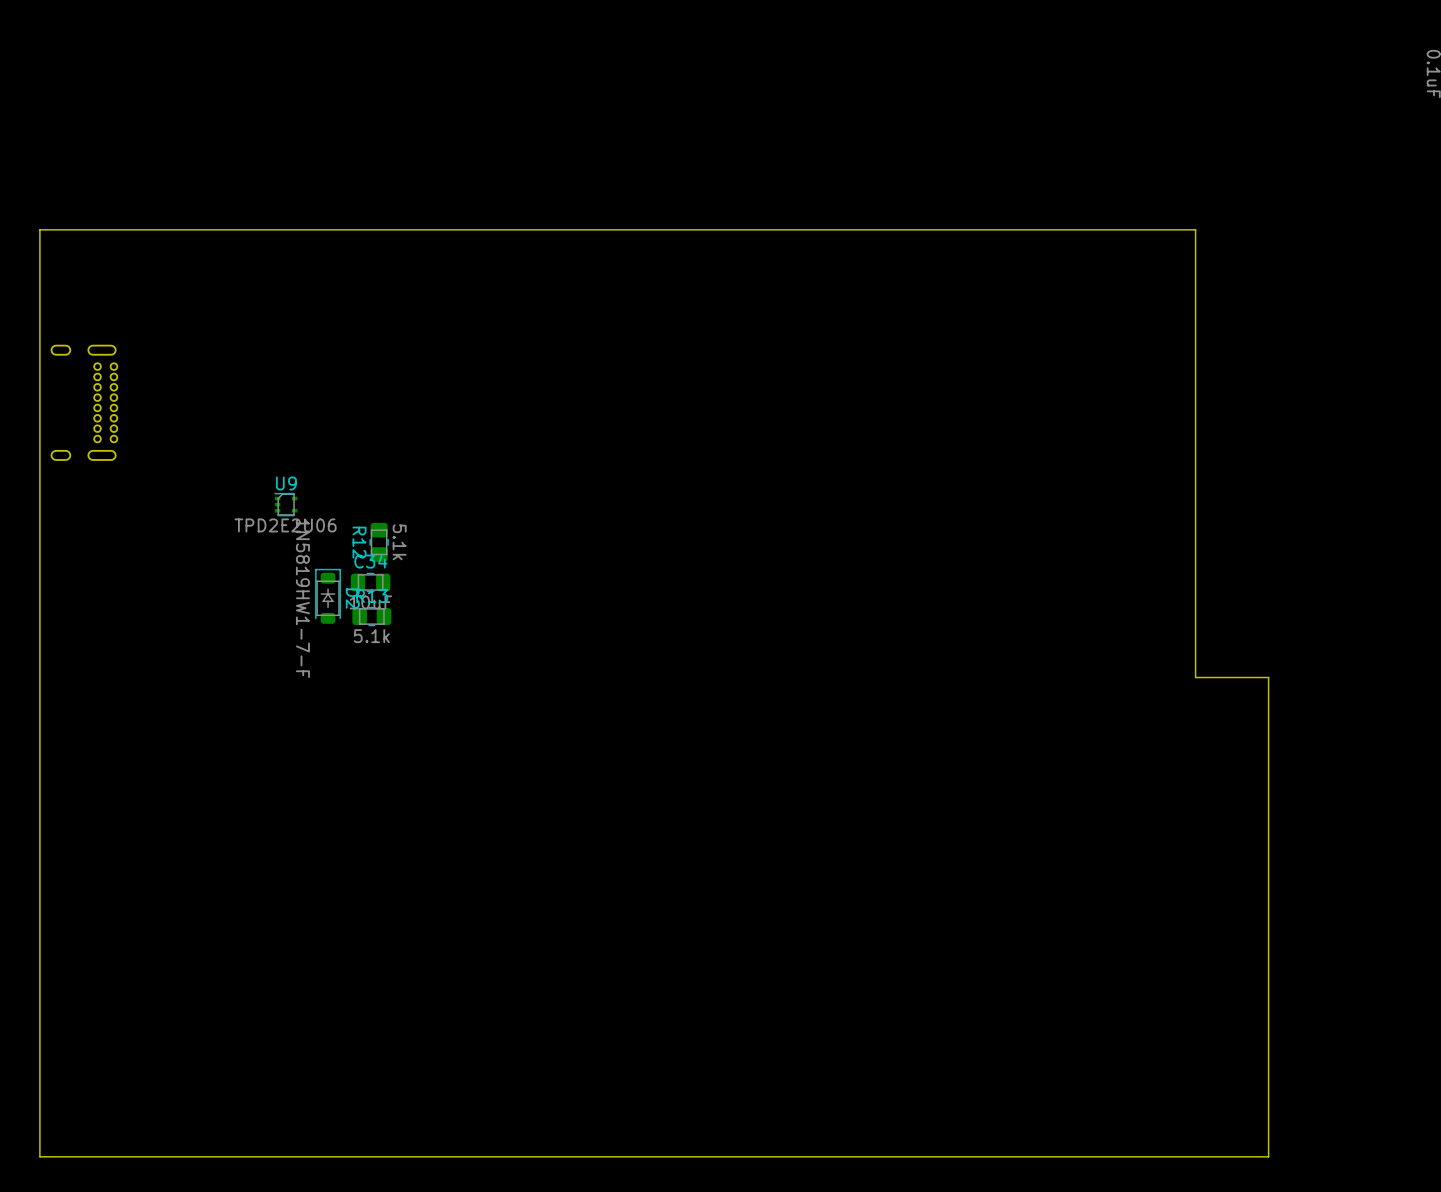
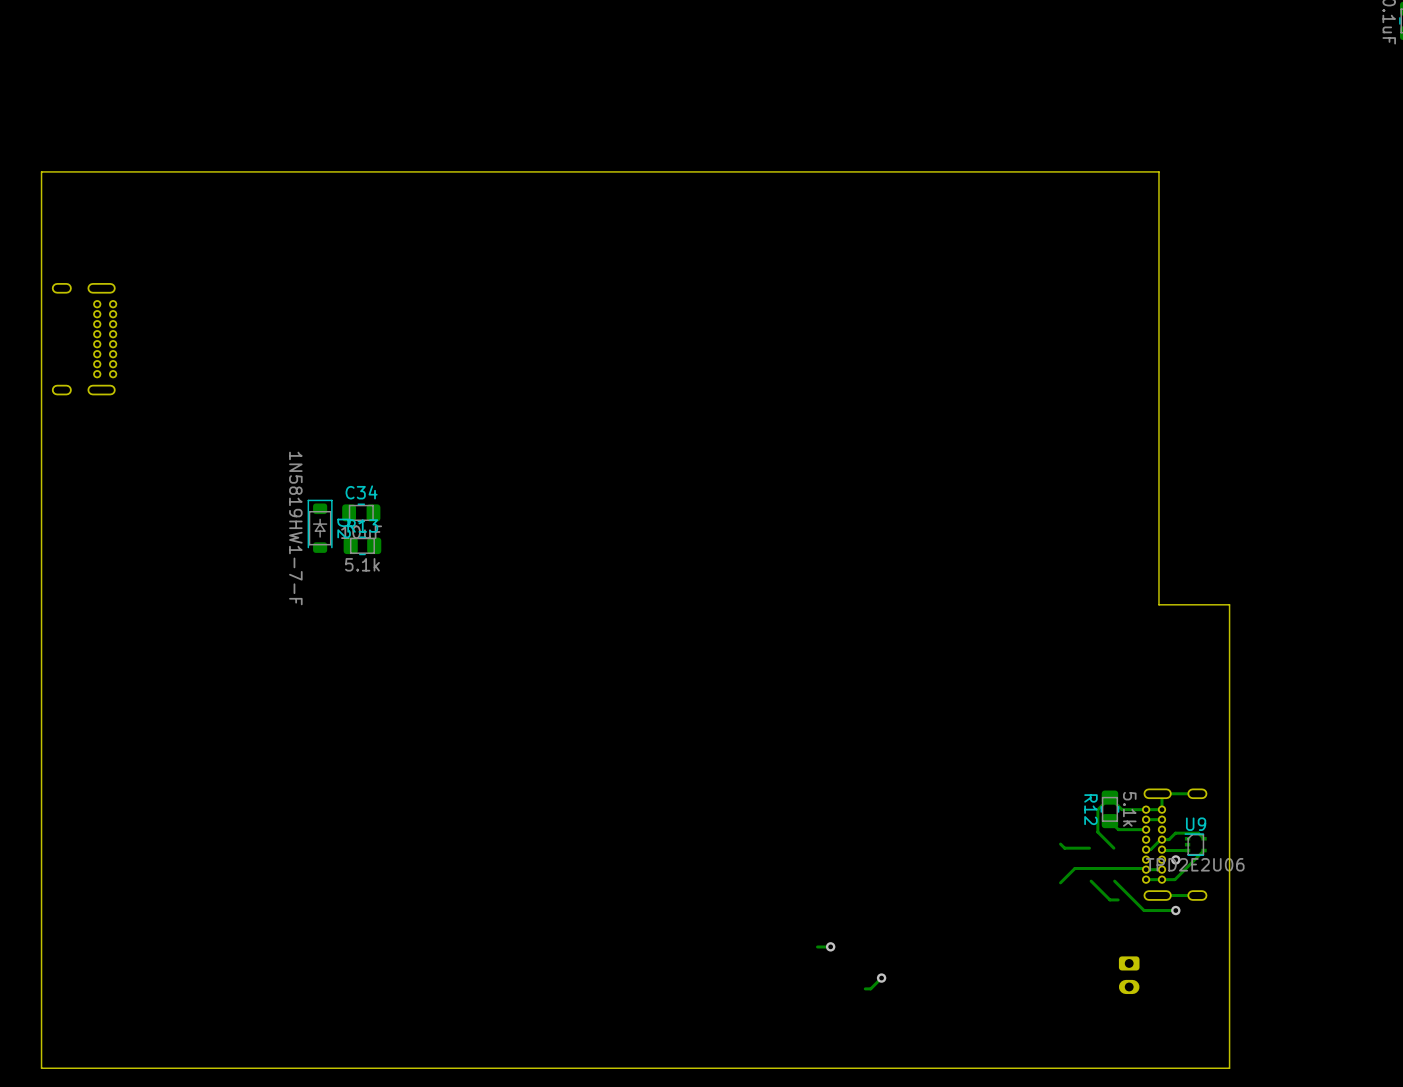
U9 position: (285, 504) -> (1195, 844)
R12 position: (379, 542) -> (1109, 809)
track: none -> (1197, 793) (1157, 793) (1161, 798) (1161, 809) (1121, 809) (1109, 797) (1097, 809) (1097, 832) (1113, 848)
track: none -> (1161, 819) (1146, 819)
track: none -> (1109, 821) (1118, 829) (1146, 829)
track: none -> (1204, 838) (1198, 833) (1175, 833) (1169, 839) (1160, 839) (1150, 849) (1146, 849)
track: none -> (1060, 844) (1064, 848) (1089, 848)
part: none -> (1174, 844)
track: none -> (1161, 849) (1187, 850)
track: none -> (1204, 850) (1174, 879) (1146, 879)
via: none -> (1175, 859)
track: none -> (1161, 869) (1074, 868) (1060, 882)
track: none -> (1091, 881) (1109, 899) (1118, 899)
track: none -> (1114, 881) (1144, 910) (1175, 910)
track: none -> (1197, 895) (1157, 895)
via: none -> (1175, 910)
track: none -> (830, 946) (817, 946)
via: none -> (830, 946)
part: none -> (1129, 975)
track: none -> (881, 978) (870, 988) (865, 988)
via: none -> (881, 978)

